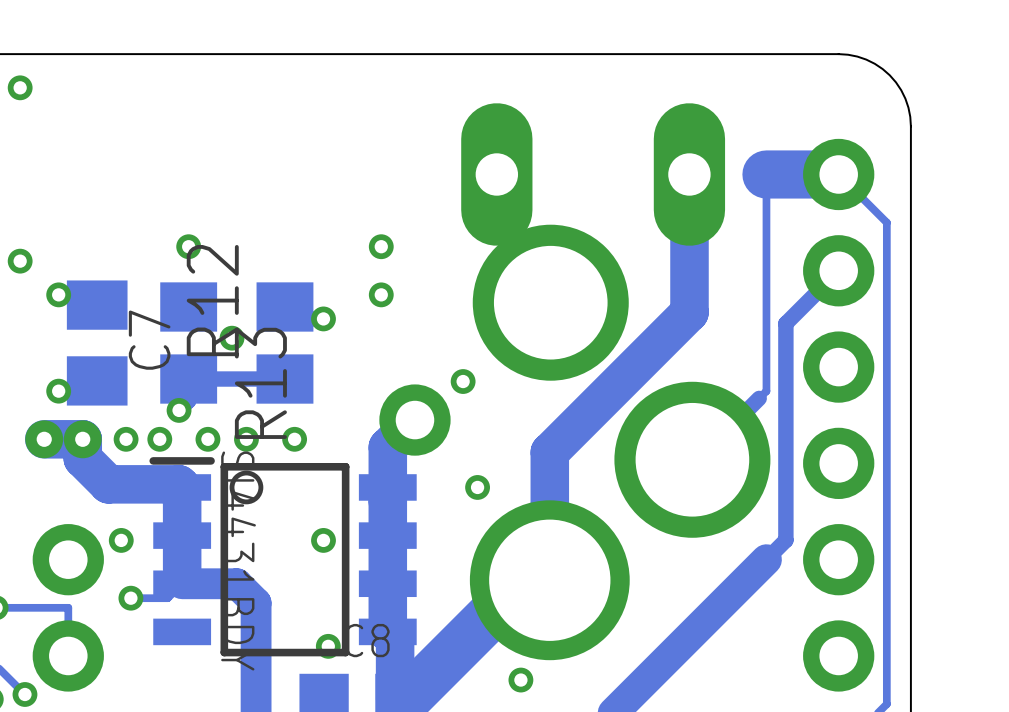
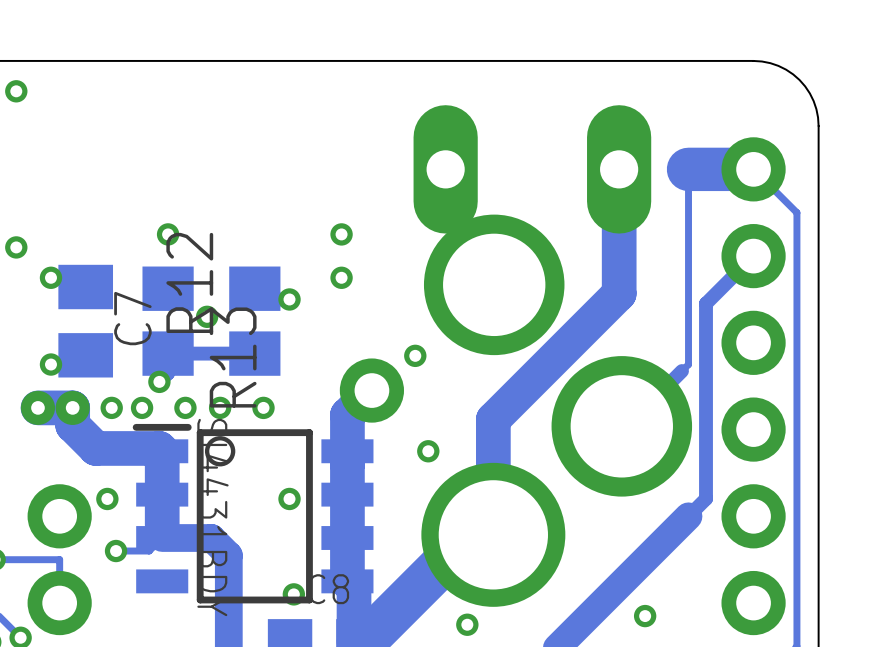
via: none -> (645, 616)

